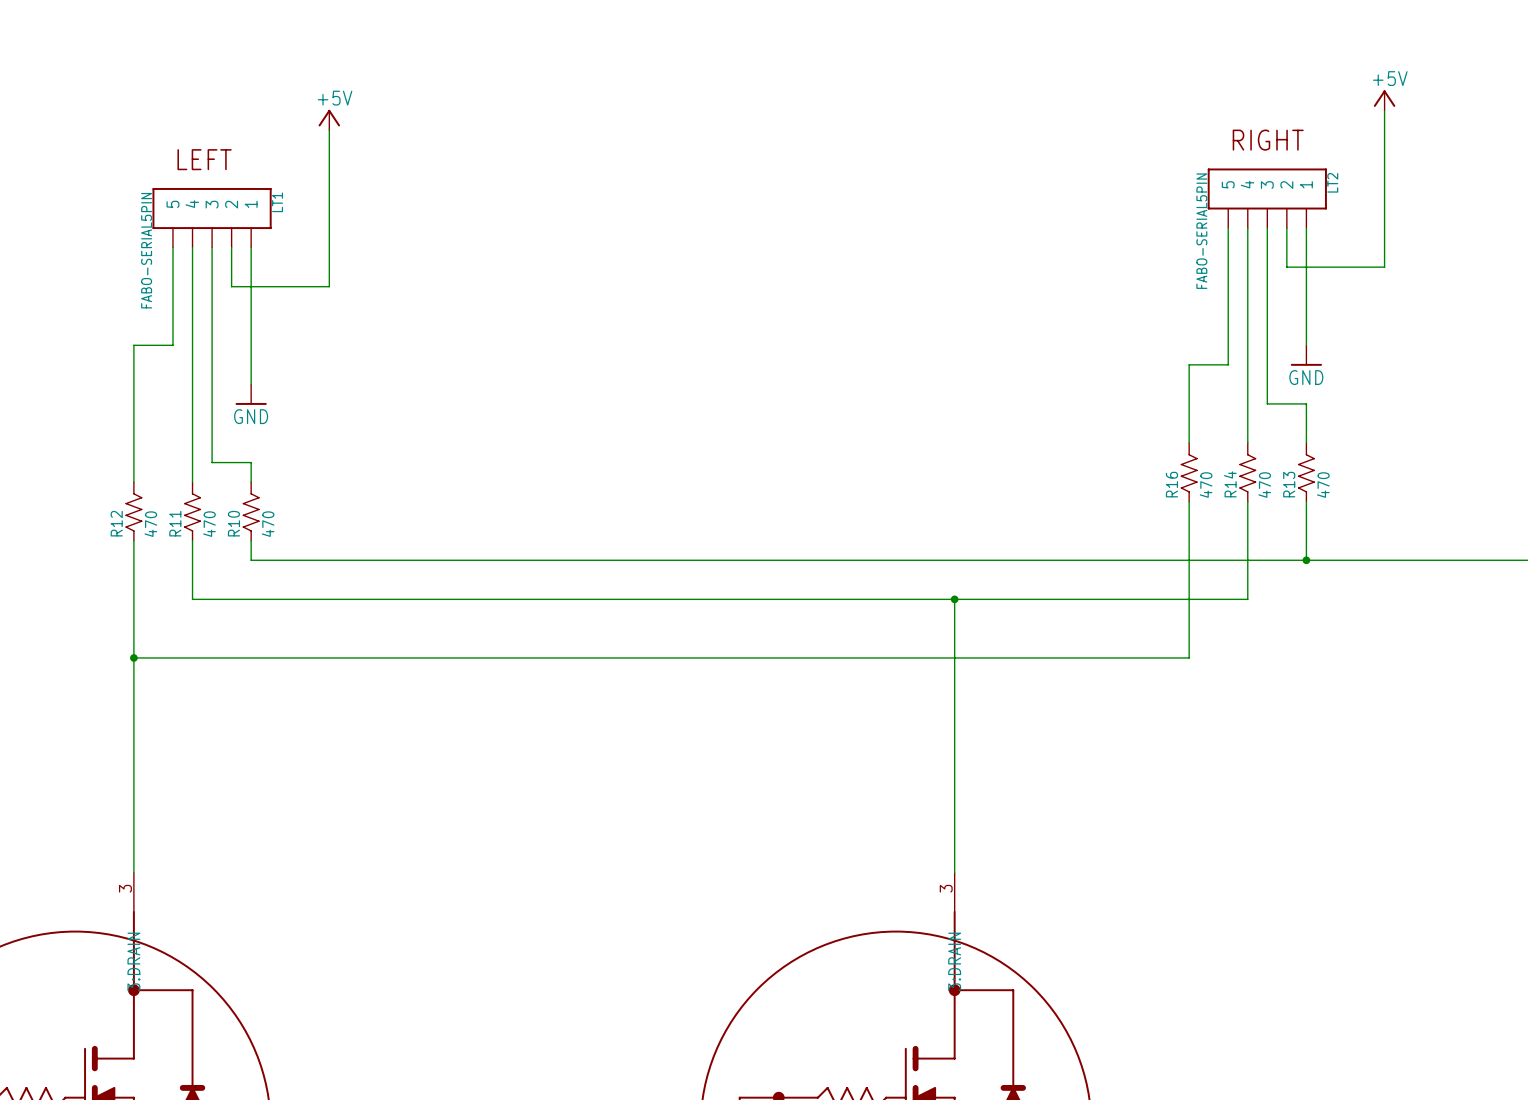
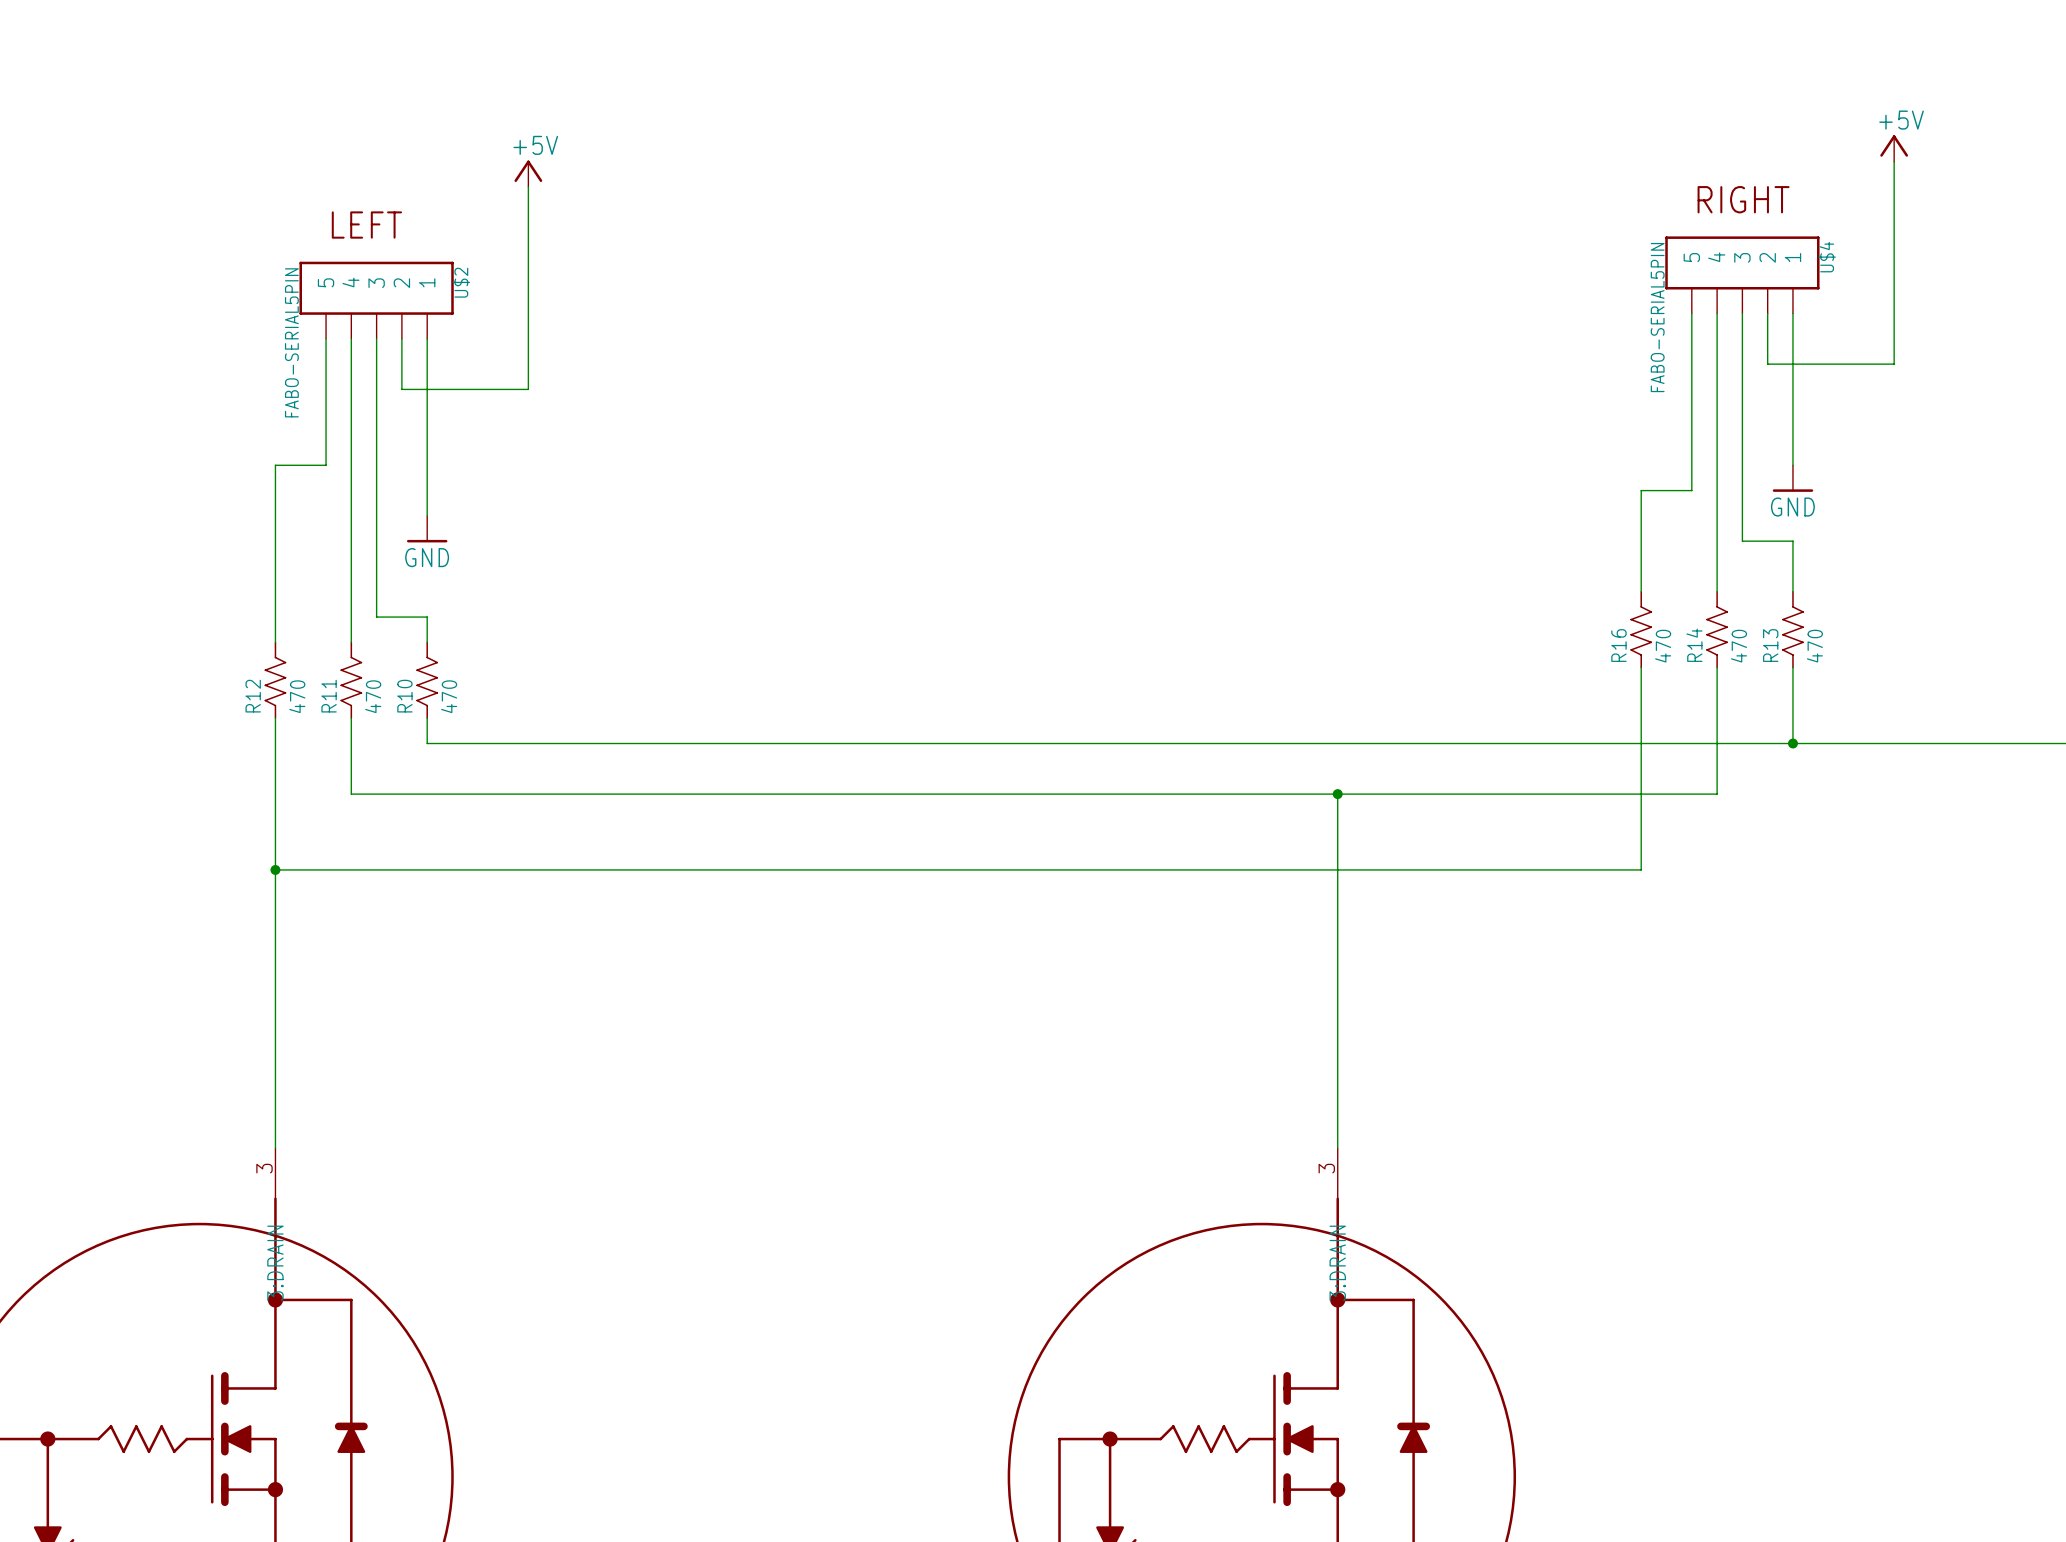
LT2 name: LT2 (1332, 182) -> U$4 (1827, 257)
LT1 name: LT1 (277, 202) -> U$2 (461, 282)

